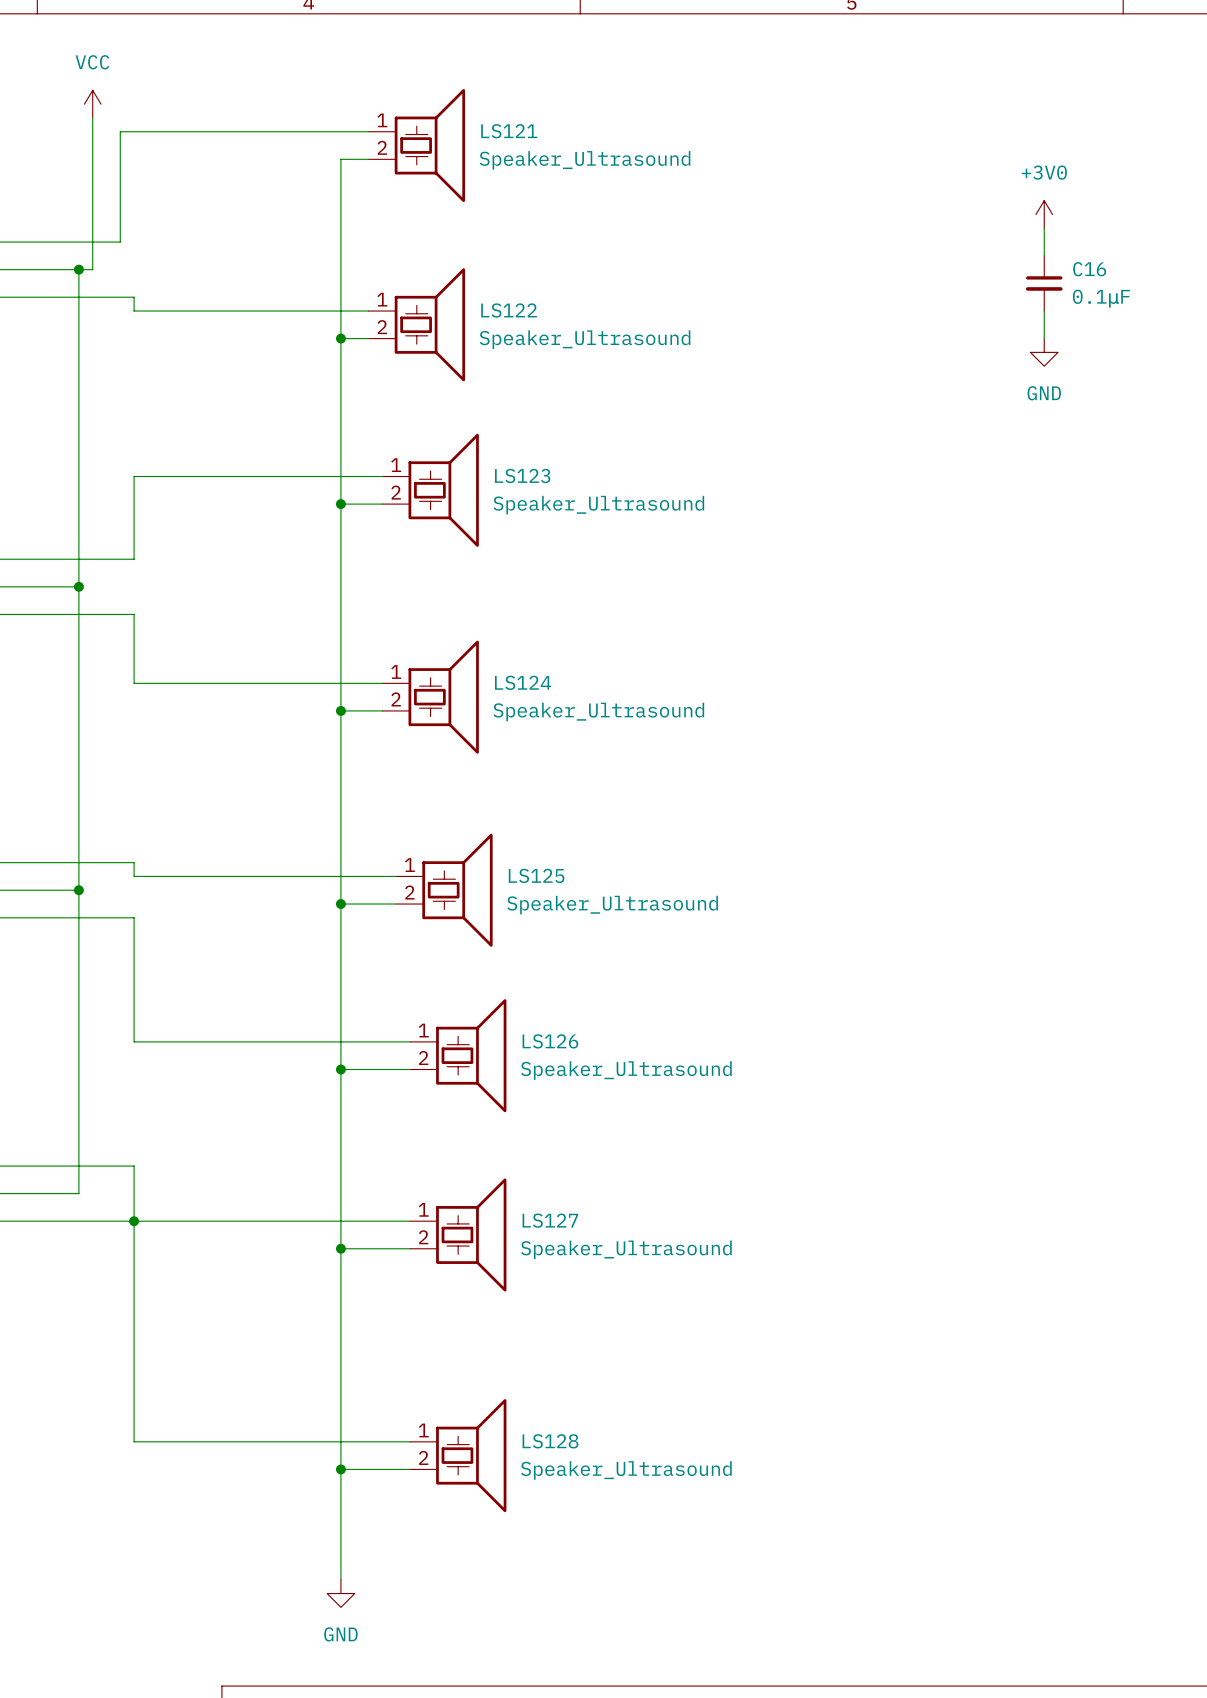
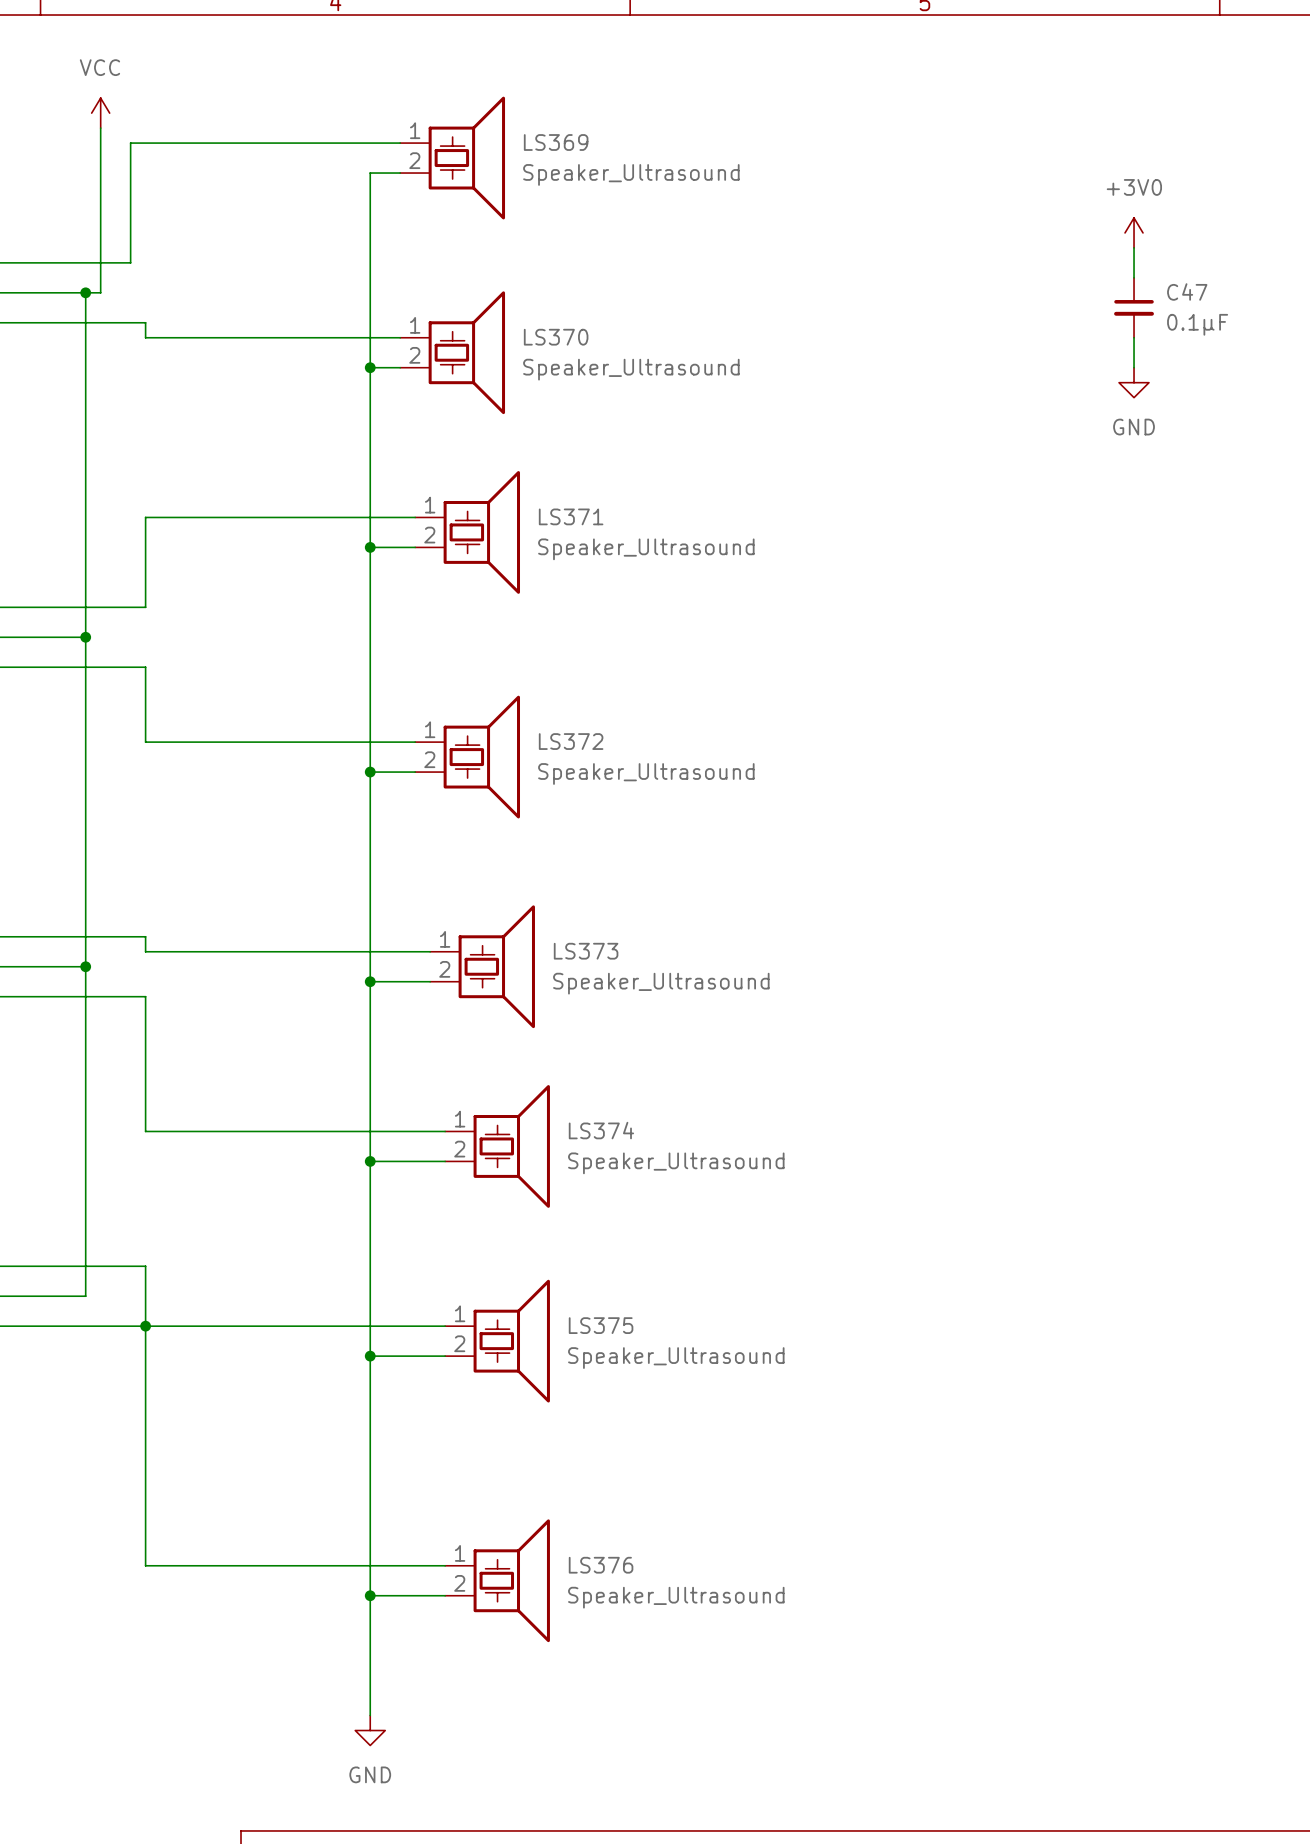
LS121 name: LS121 (509, 131) -> LS369 (556, 142)
C16 name: C16 (1089, 269) -> C47 (1187, 291)
LS122 name: LS122 (509, 310) -> LS370 (556, 337)
LS123 name: LS123 (522, 475) -> LS371 (571, 516)
LS124 name: LS124 (523, 682) -> LS372 (571, 741)
LS125 name: LS125 (536, 875) -> LS373 (586, 951)
LS126 name: LS126 (550, 1041) -> LS374 (601, 1130)
LS127 name: LS127 (550, 1220) -> LS375 (601, 1325)
LS128 name: LS128 (550, 1441) -> LS376 (601, 1565)

